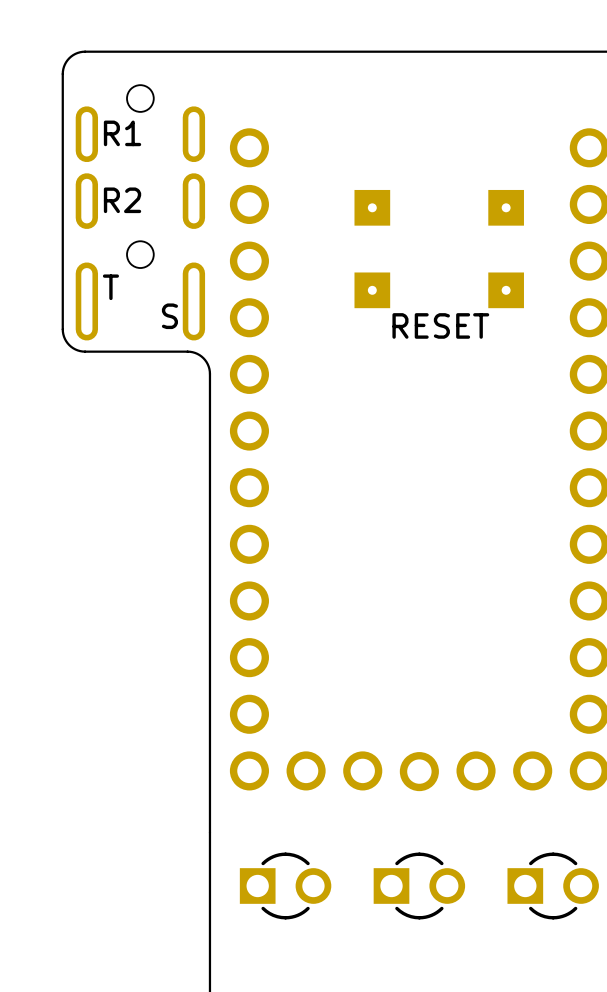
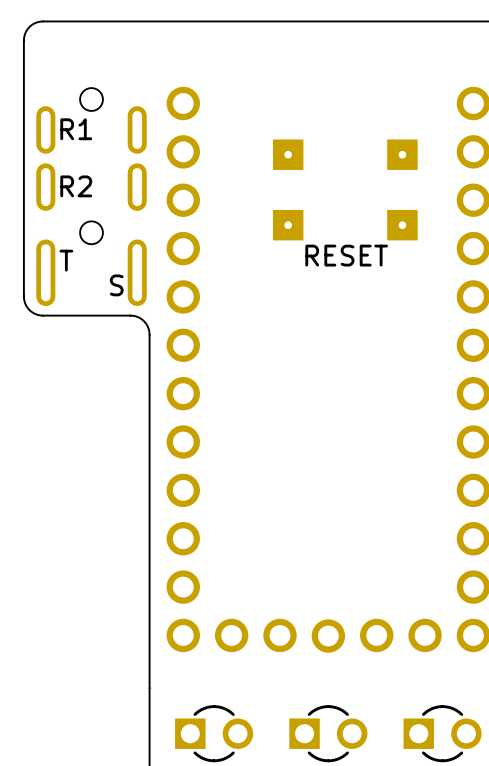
part position: (140, 212) -> (91, 197)
board edge: (62, 329) (67, 343) (80, 351) (187, 351) (199, 355) (206, 362) (209, 371) (209, 418) -> (23, 258) (24, 298) (26, 306) (32, 312) (42, 315) (134, 316) (145, 322) (149, 334)

